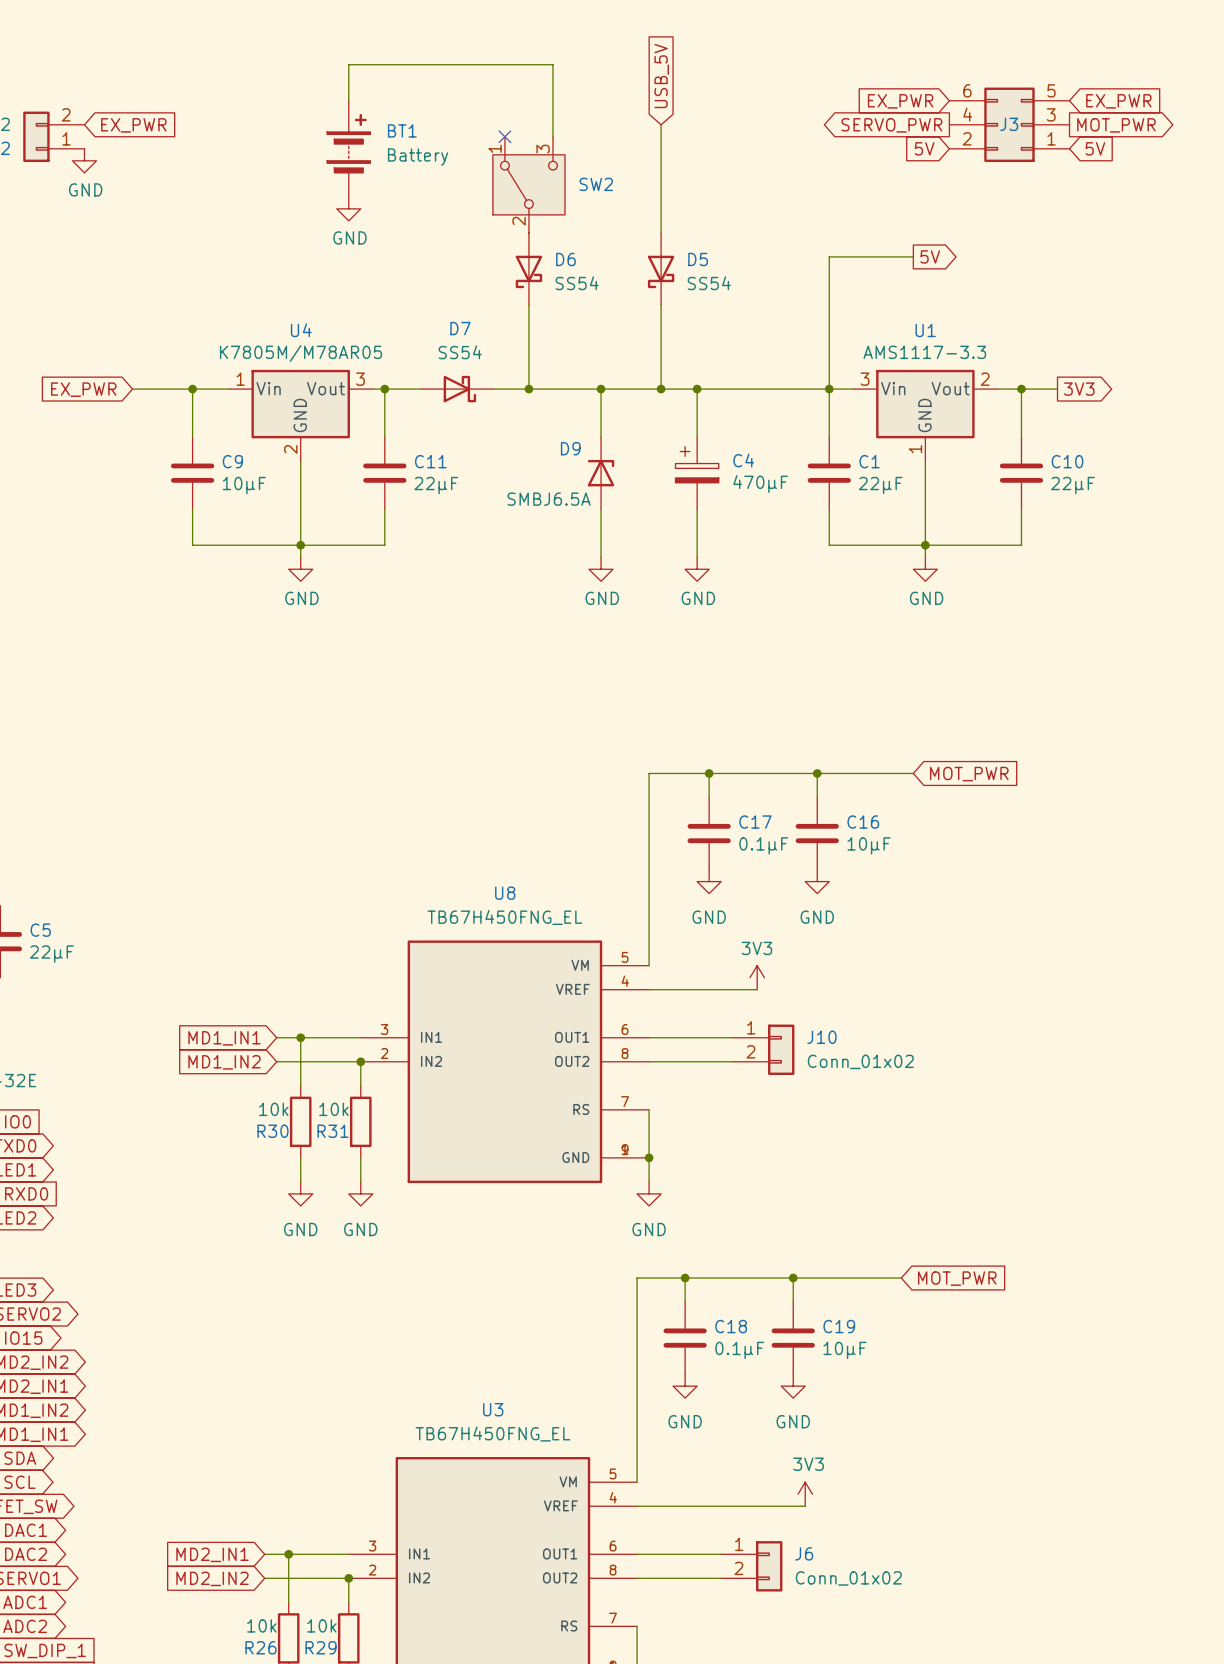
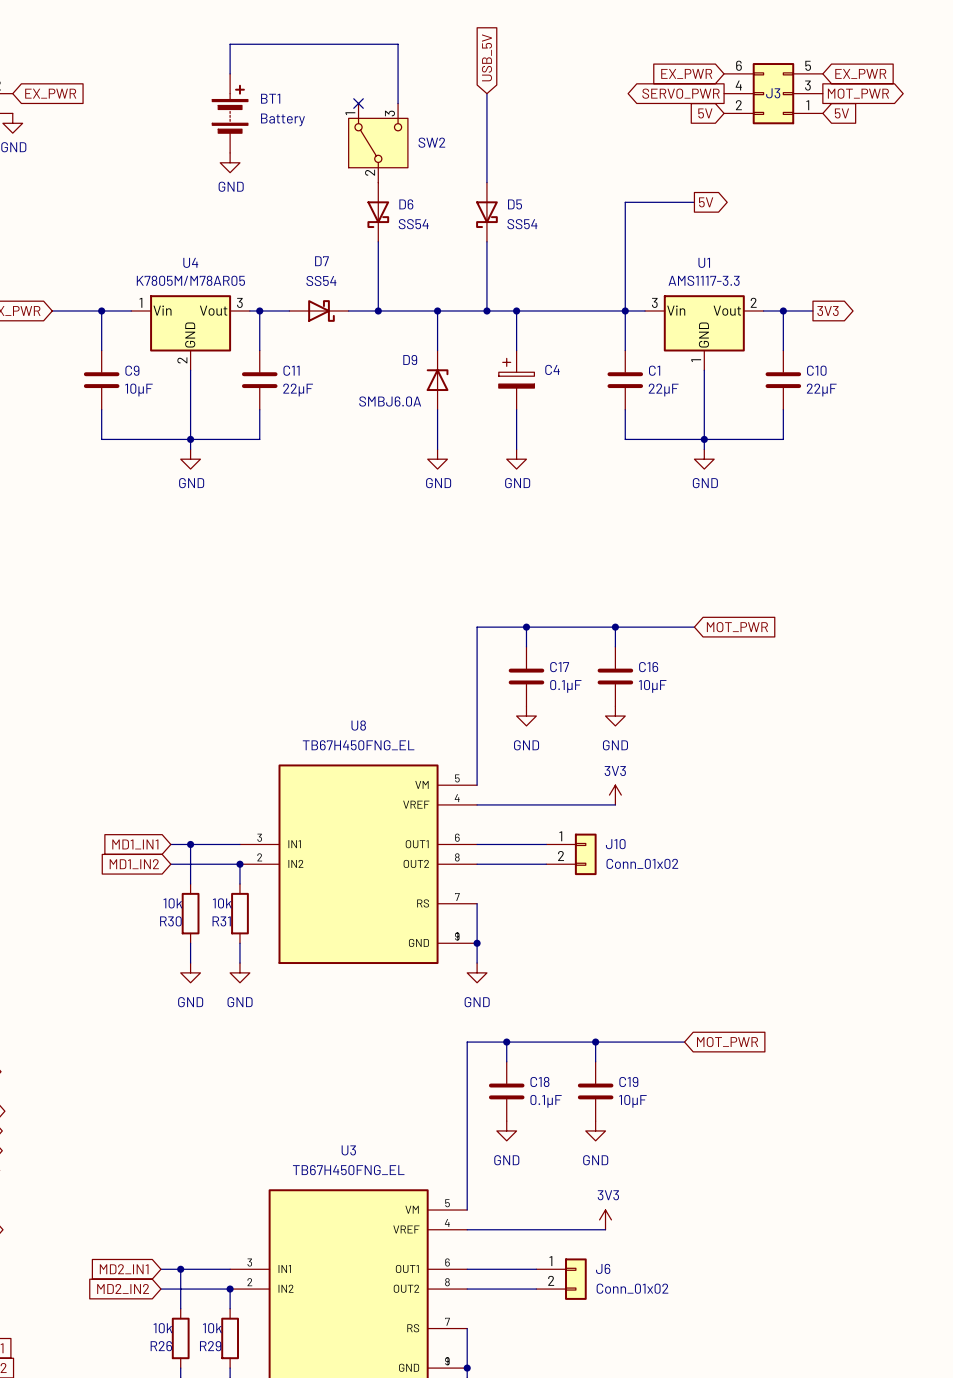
C4 value: 470μF (760, 484) -> none
D9 value: SMBJ6.5A (549, 499) -> SMBJ6.0A (390, 401)
power symbol position: 3V3 (757, 977) -> 3V3 (615, 795)
wire: none -> (565, 804) (615, 804)

